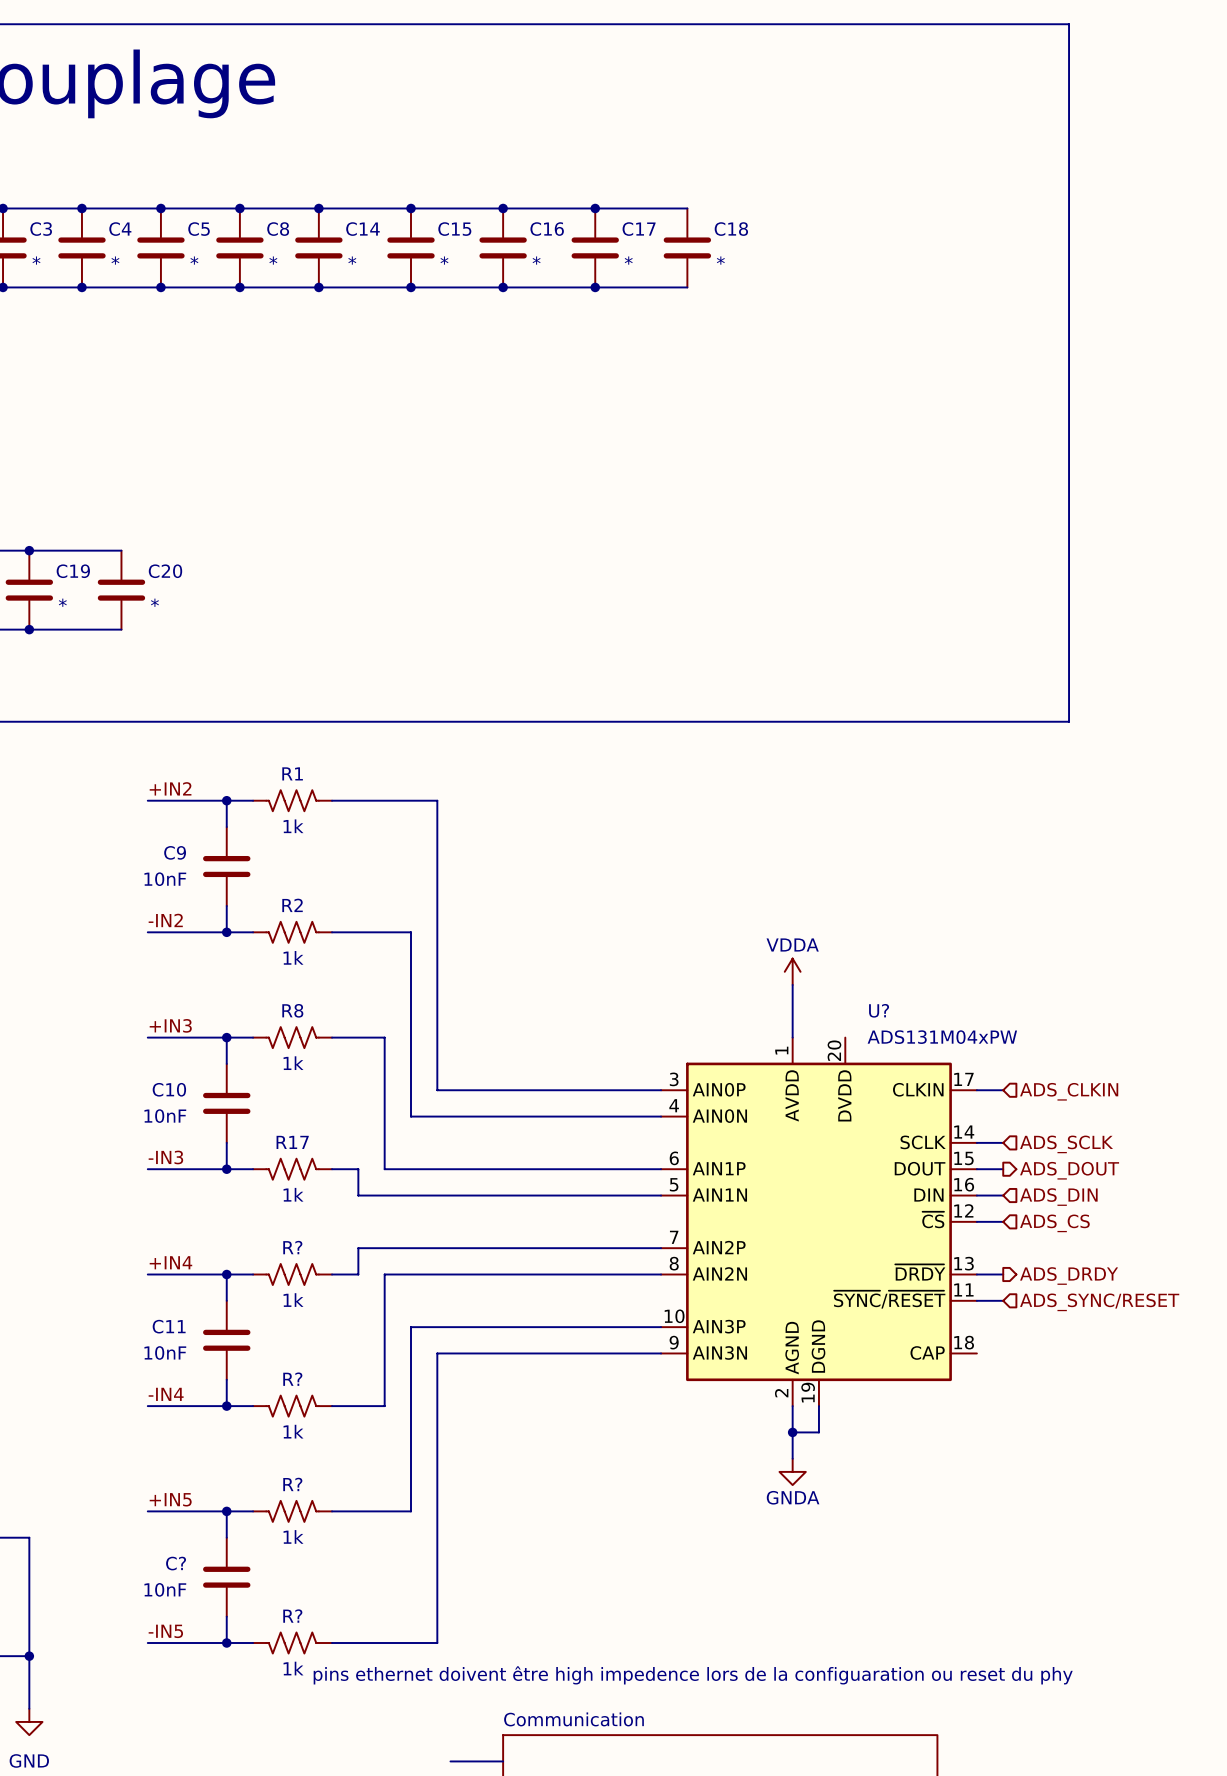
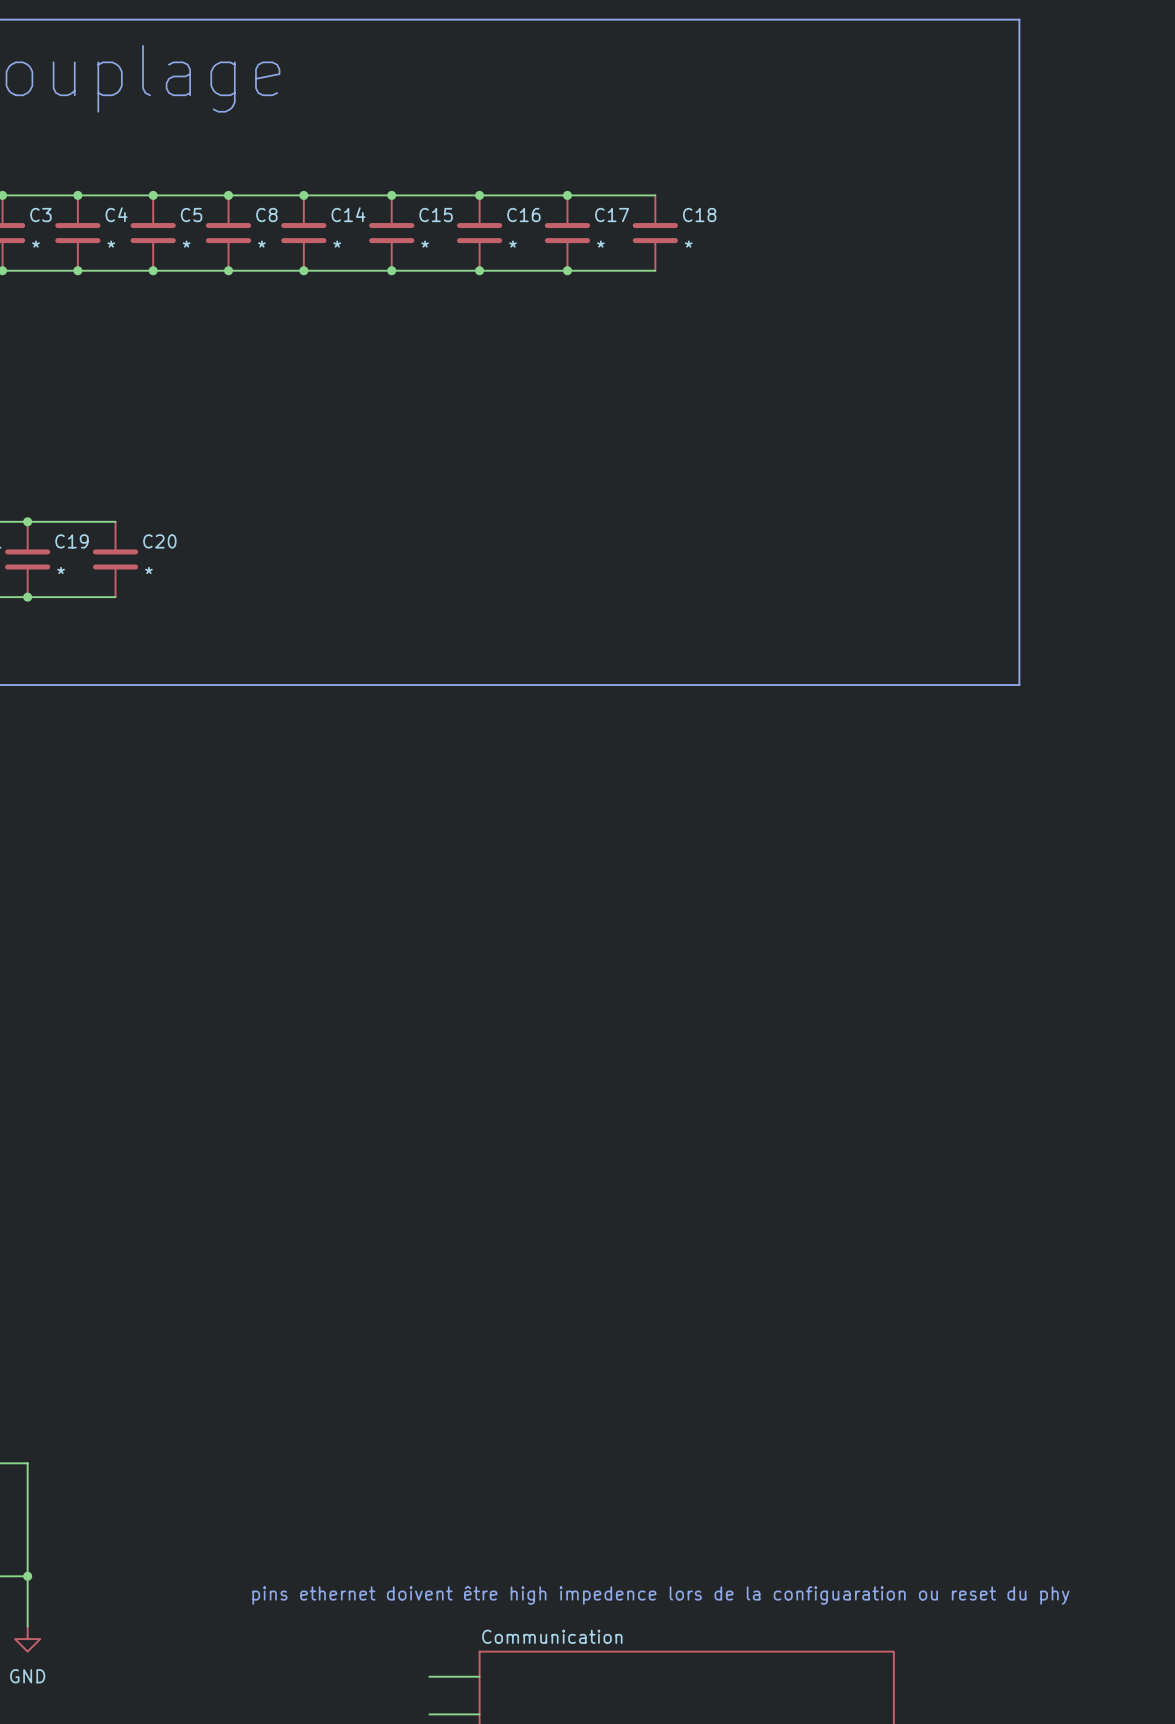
label: +IN2 (170, 788) -> none
wire: (147, 800) (253, 800) -> none
wire: (226, 800) (226, 827) -> none
junction: (226, 800) -> none
R1: 1k (292, 800) -> none
wire: (332, 800) (437, 800) (437, 1090) (661, 1090) -> none
C9: 10nF (226, 866) -> none
wire: (226, 906) (226, 932) -> none
label: -IN2 (165, 920) -> none
wire: (147, 932) (253, 932) -> none
junction: (226, 932) -> none
R2: 1k (292, 932) -> none
wire: (332, 932) (411, 932) (411, 1116) (661, 1116) -> none
power symbol: VDDA (792, 971) -> none
wire: (792, 984) (792, 1037) -> none
label: +IN3 (170, 1025) -> none
wire: (147, 1037) (253, 1037) -> none
wire: (226, 1037) (226, 1063) -> none
junction: (226, 1037) -> none
R8: 1k (292, 1037) -> none
wire: (332, 1037) (384, 1037) (384, 1169) (661, 1169) -> none
wire: (976, 1090) (1003, 1090) -> none
hierarchical label: ADS_CLKIN (1069, 1091) -> none
C10: 10nF (226, 1103) -> none
wire: (226, 1142) (226, 1169) -> none
wire: (976, 1142) (1003, 1142) -> none
hierarchical label: ADS_SCLK (1066, 1144) -> none
label: -IN3 (165, 1157) -> none
wire: (147, 1169) (253, 1169) -> none
junction: (226, 1169) -> none
R17: 1k (292, 1169) -> none
wire: (332, 1169) (358, 1169) (358, 1195) (661, 1195) -> none
wire: (976, 1169) (1003, 1169) -> none
hierarchical label: ADS_DOUT (1069, 1170) -> none
wire: (976, 1195) (1003, 1195) -> none
hierarchical label: ADS_DIN (1058, 1197) -> none
U?: ADS131M04xPW (818, 1221) -> none
wire: (976, 1221) (1003, 1221) -> none
hierarchical label: ADS_CS (1054, 1223) -> none
wire: (661, 1248) (358, 1248) (358, 1274) (332, 1274) -> none
label: +IN4 (170, 1262) -> none
wire: (147, 1274) (253, 1274) -> none
wire: (226, 1274) (226, 1300) -> none
junction: (226, 1274) -> none
R?: 1k (292, 1274) -> none
wire: (661, 1274) (384, 1274) (384, 1406) (332, 1406) -> none
wire: (976, 1274) (1003, 1274) -> none
hierarchical label: ADS_DRDY (1069, 1276) -> none
wire: (976, 1300) (1003, 1300) -> none
hierarchical label: ADS_SYNC/RESET (1099, 1302) -> none
wire: (661, 1327) (411, 1327) (411, 1511) (332, 1511) -> none
C11: 10nF (226, 1340) -> none
wire: (661, 1353) (437, 1353) (437, 1643) (332, 1643) -> none
wire: (226, 1379) (226, 1406) -> none
label: -IN4 (166, 1394) -> none
wire: (147, 1406) (253, 1406) -> none
junction: (226, 1406) -> none
R?: 1k (292, 1406) -> none
wire: (792, 1406) (792, 1458) -> none
wire: (818, 1406) (818, 1432) (792, 1432) -> none
junction: (792, 1432) -> none
power symbol: GNDA (792, 1471) -> none
label: +IN5 (170, 1499) -> none
wire: (147, 1511) (253, 1511) -> none
wire: (226, 1511) (226, 1537) -> none
junction: (226, 1511) -> none
R?: 1k (292, 1511) -> none
C?: 10nF (226, 1577) -> none
wire: (226, 1616) (226, 1643) -> none
label: -IN5 (165, 1631) -> none
wire: (147, 1643) (253, 1643) -> none
junction: (226, 1643) -> none
R?: 1k (292, 1643) -> none

